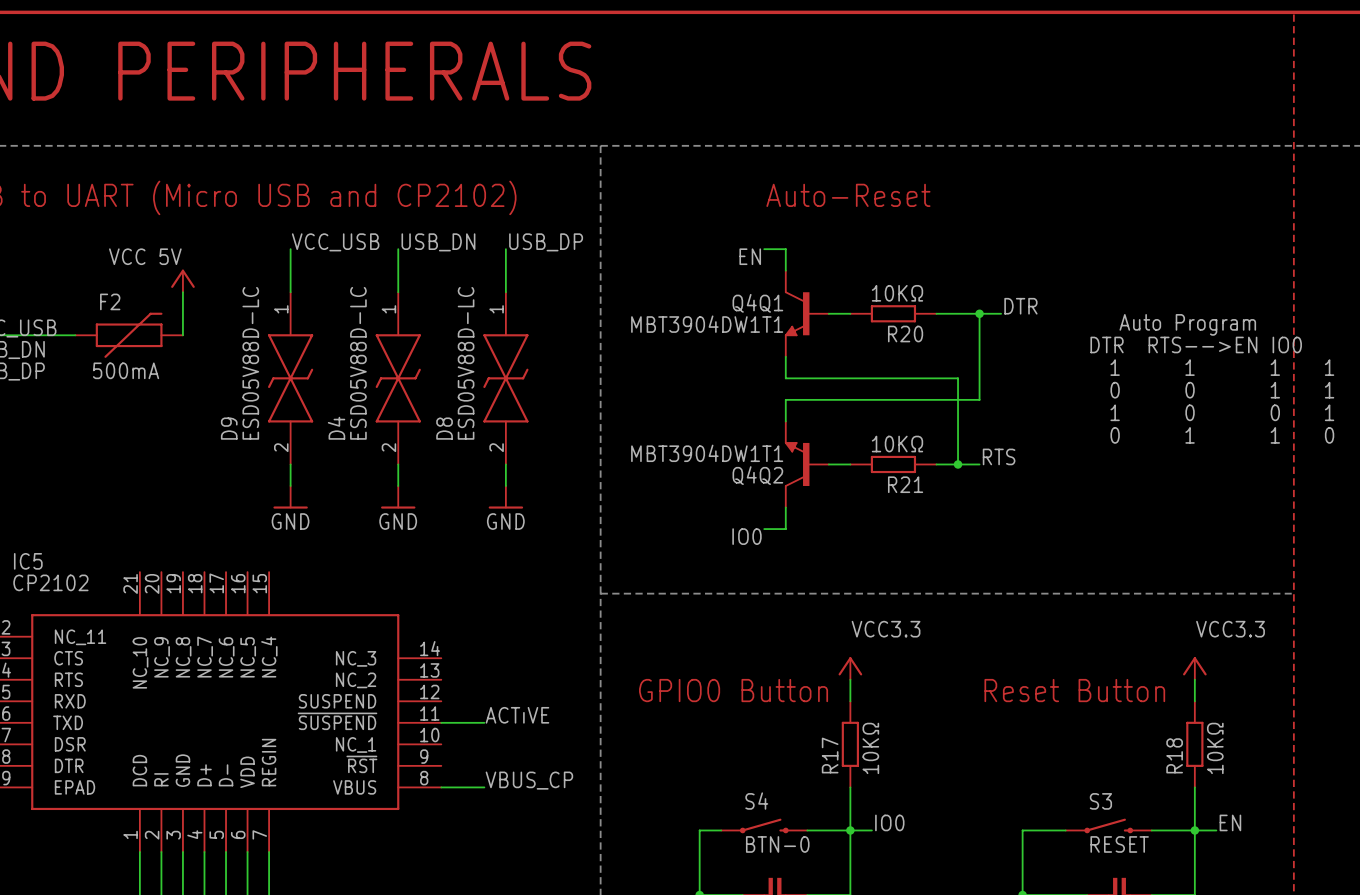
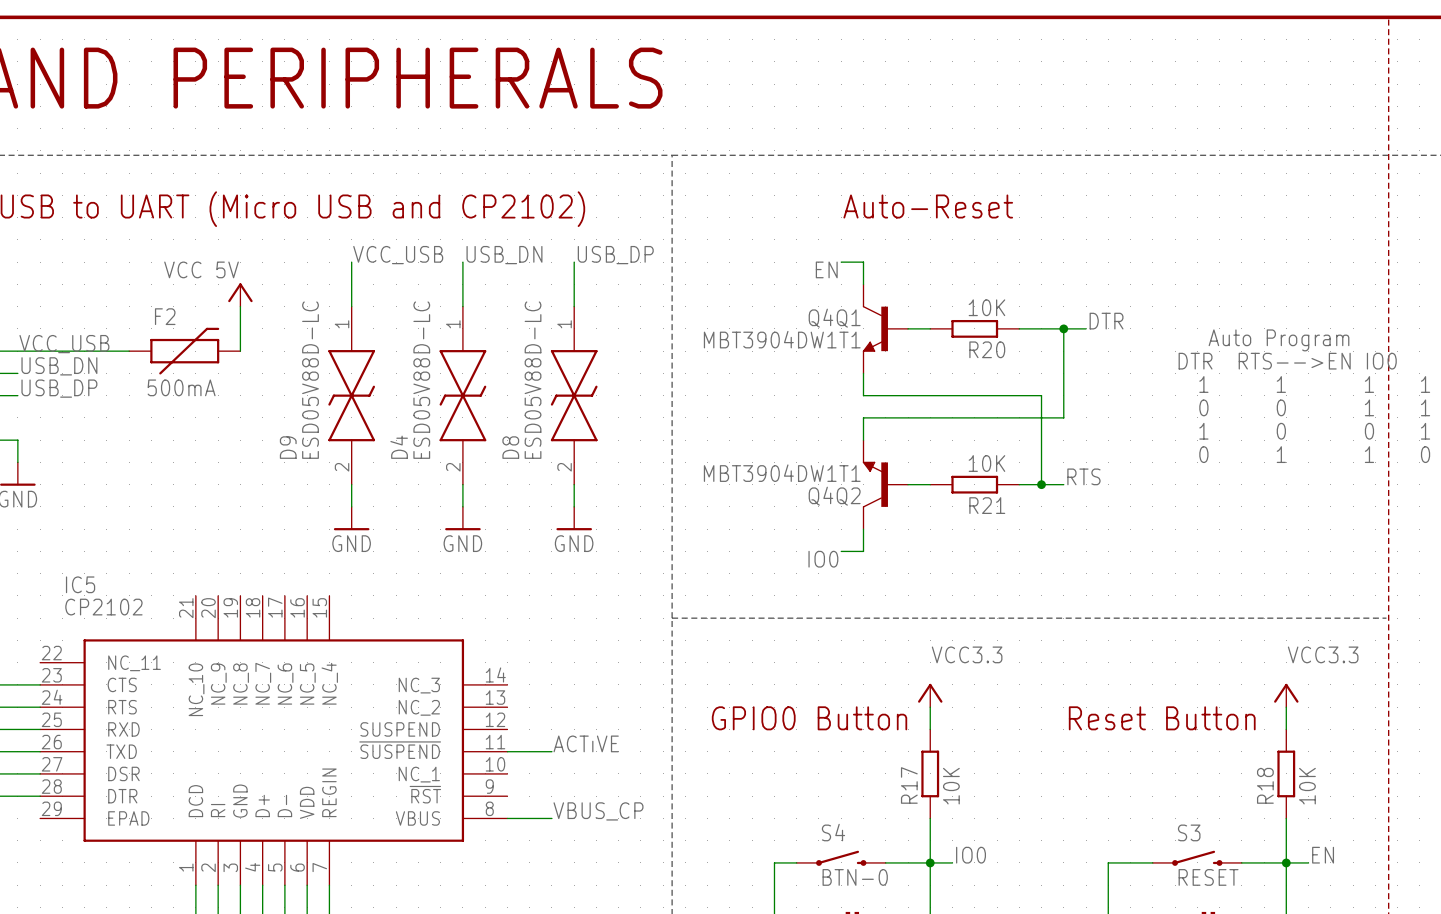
R20 value: 10KΩ (897, 293) -> 10K (986, 307)
R21 value: 10KΩ (897, 444) -> 10K (986, 463)
R17 value: 10KΩ (870, 748) -> 10K (951, 786)
R18 value: 10KΩ (1215, 748) -> 10K (1307, 786)

